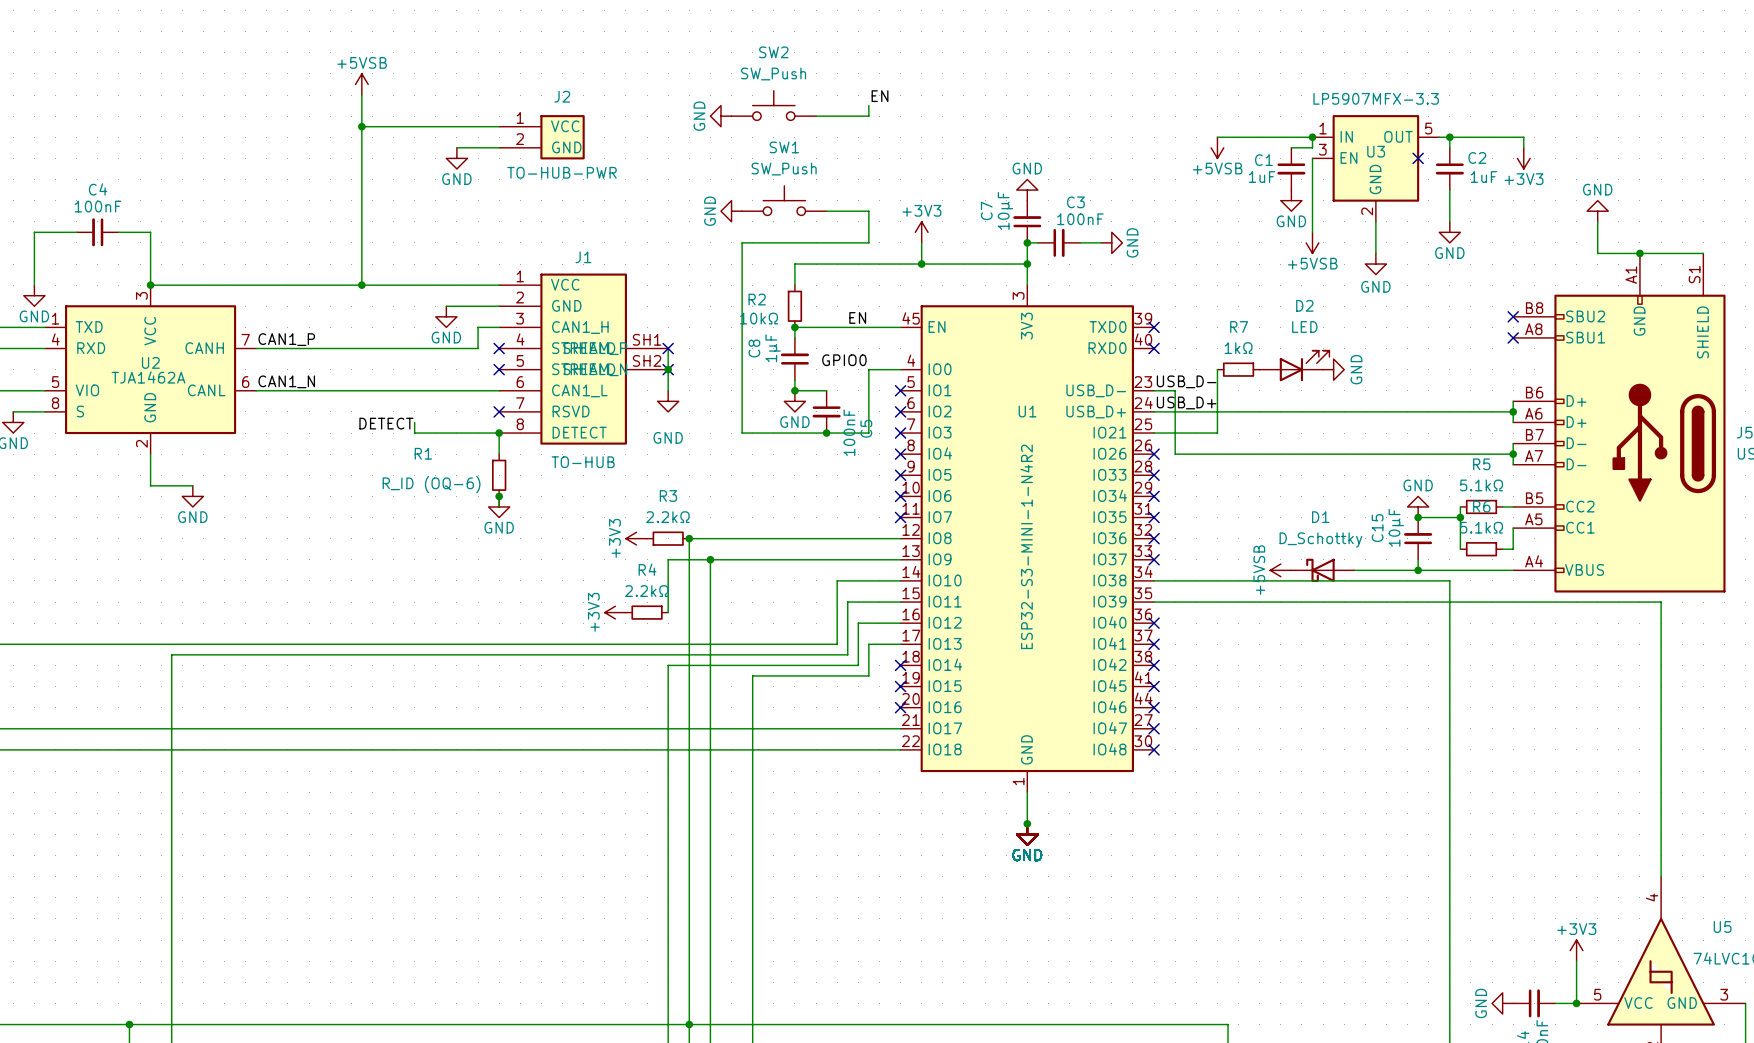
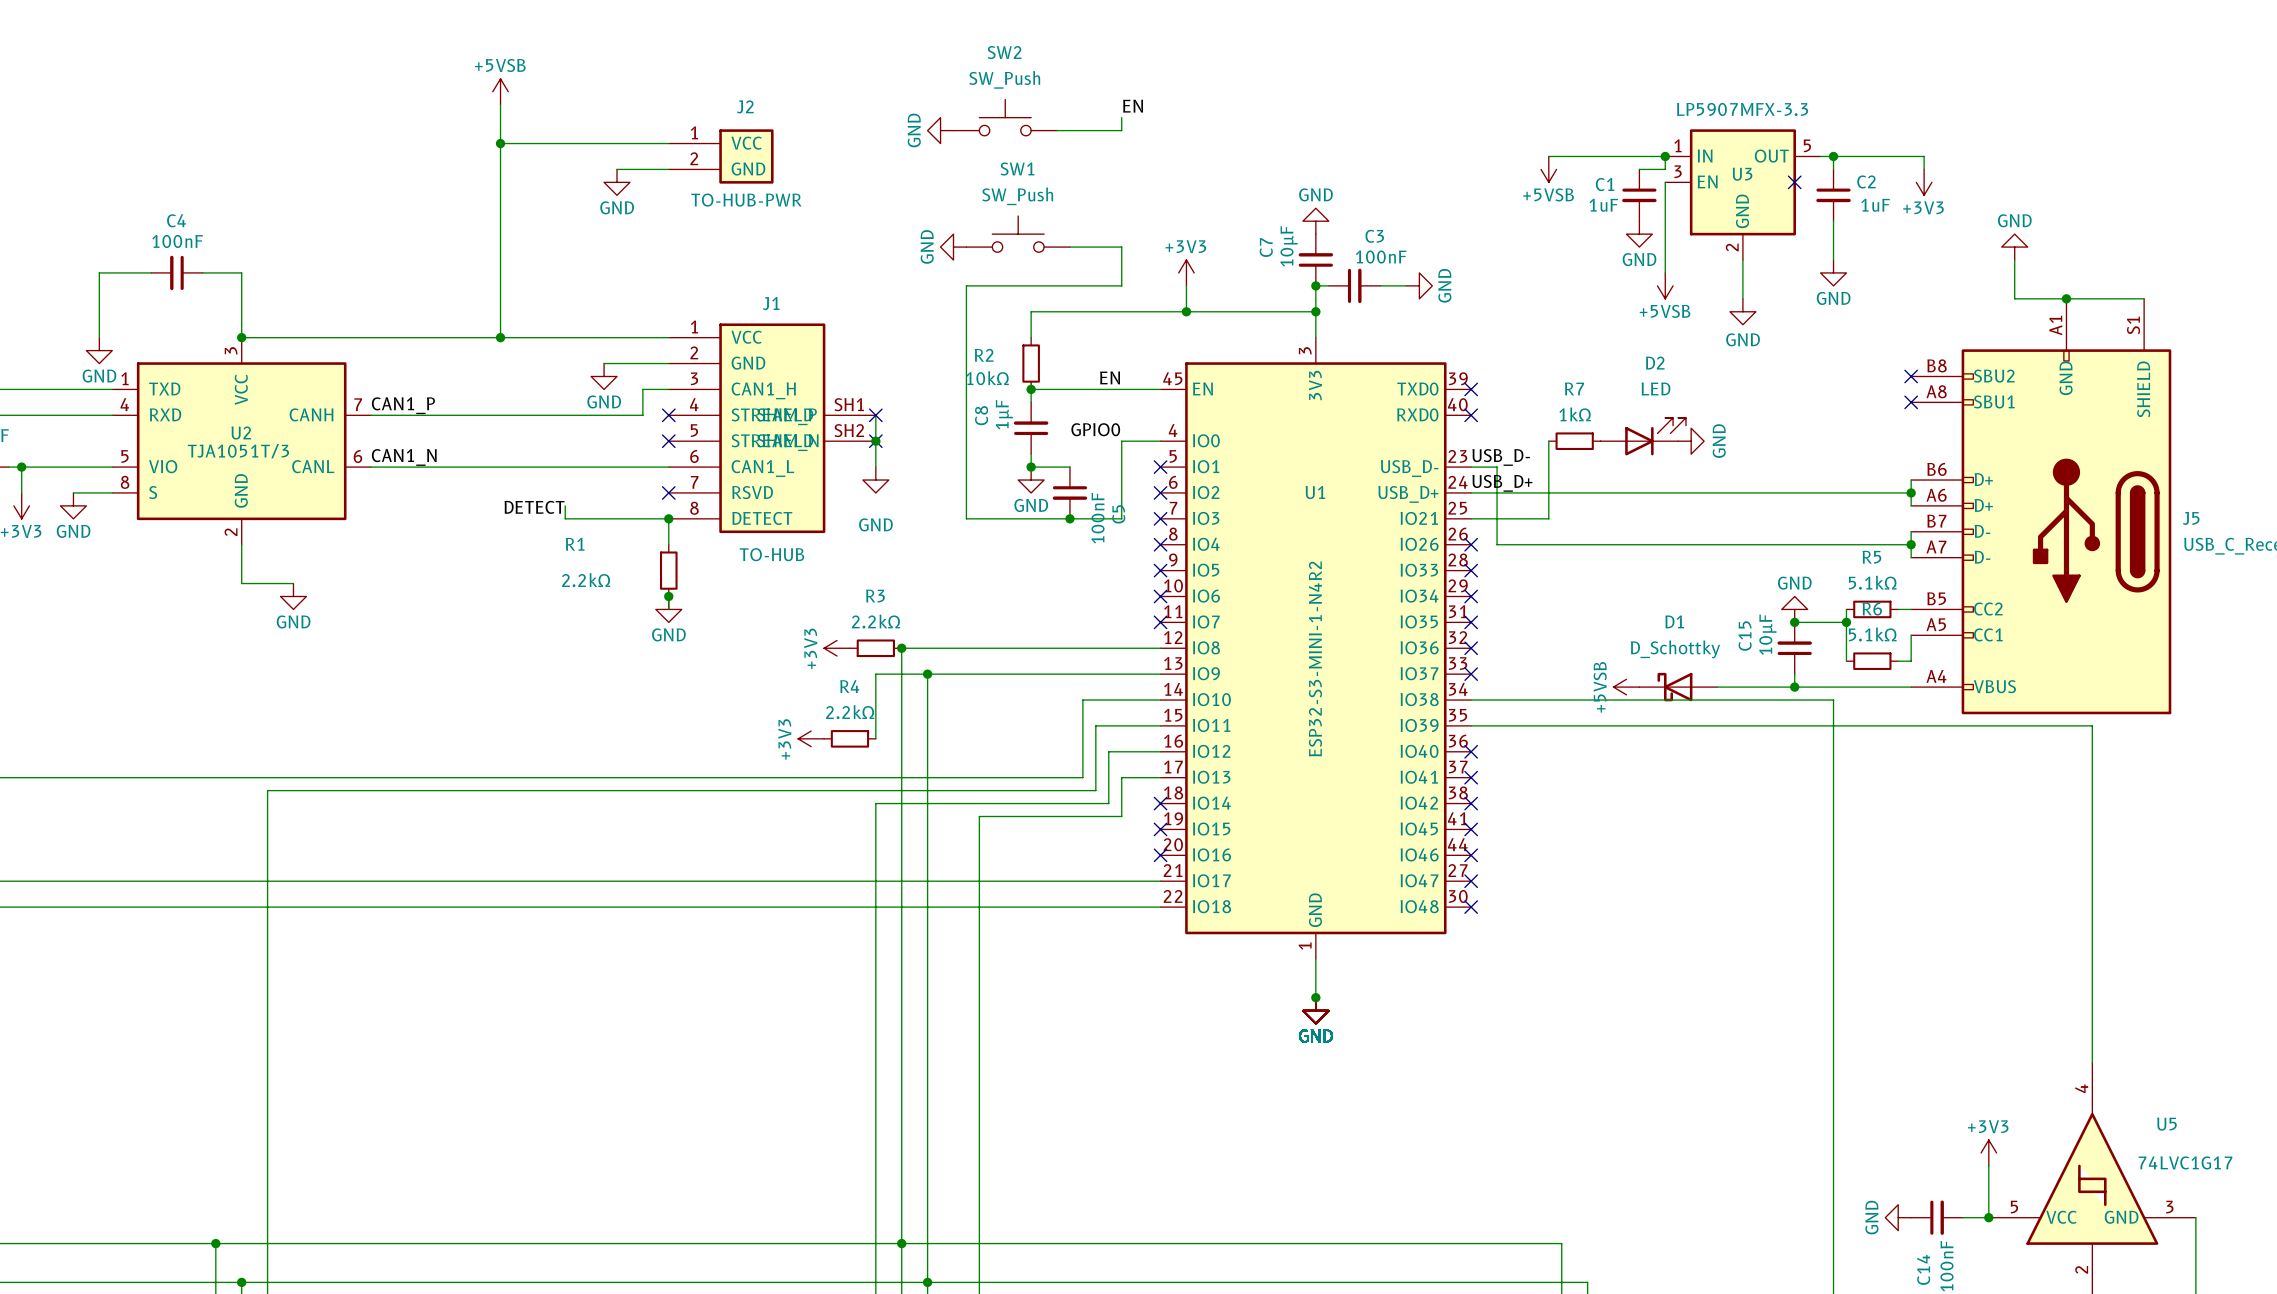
U2 value: TJA1462A (148, 377) -> TJA1051T/3 (238, 451)
R1 value: R_ID (OQ-6) (431, 484) -> 2.2kΩ (586, 580)

